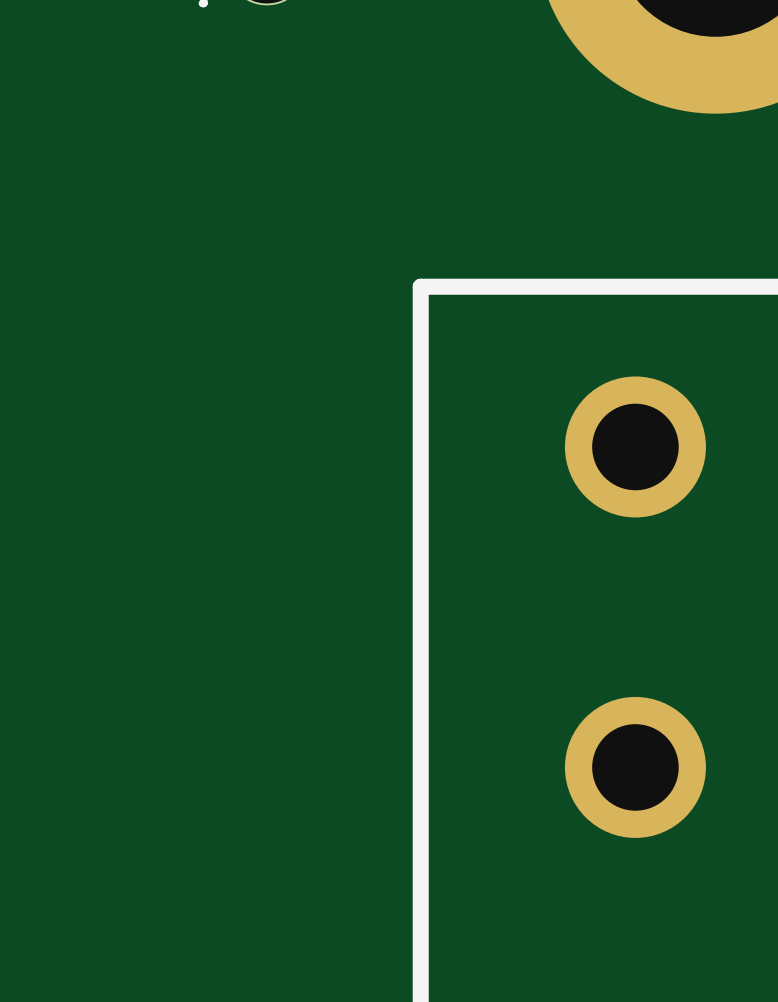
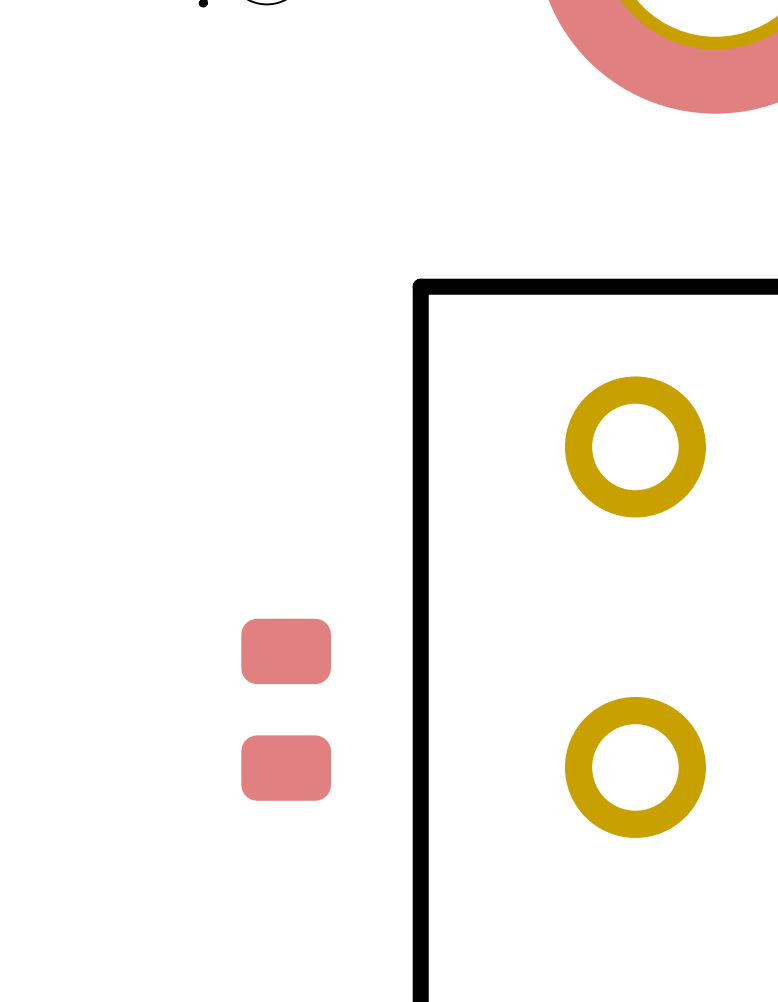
part: none -> (286, 709)

